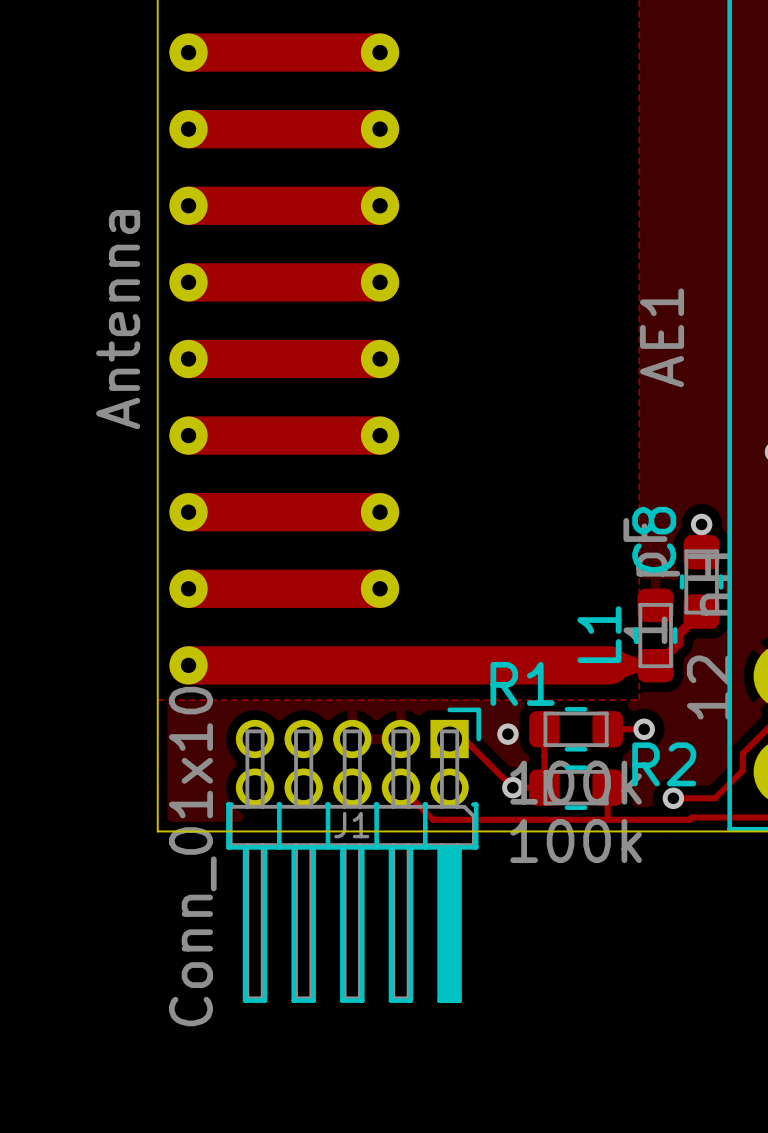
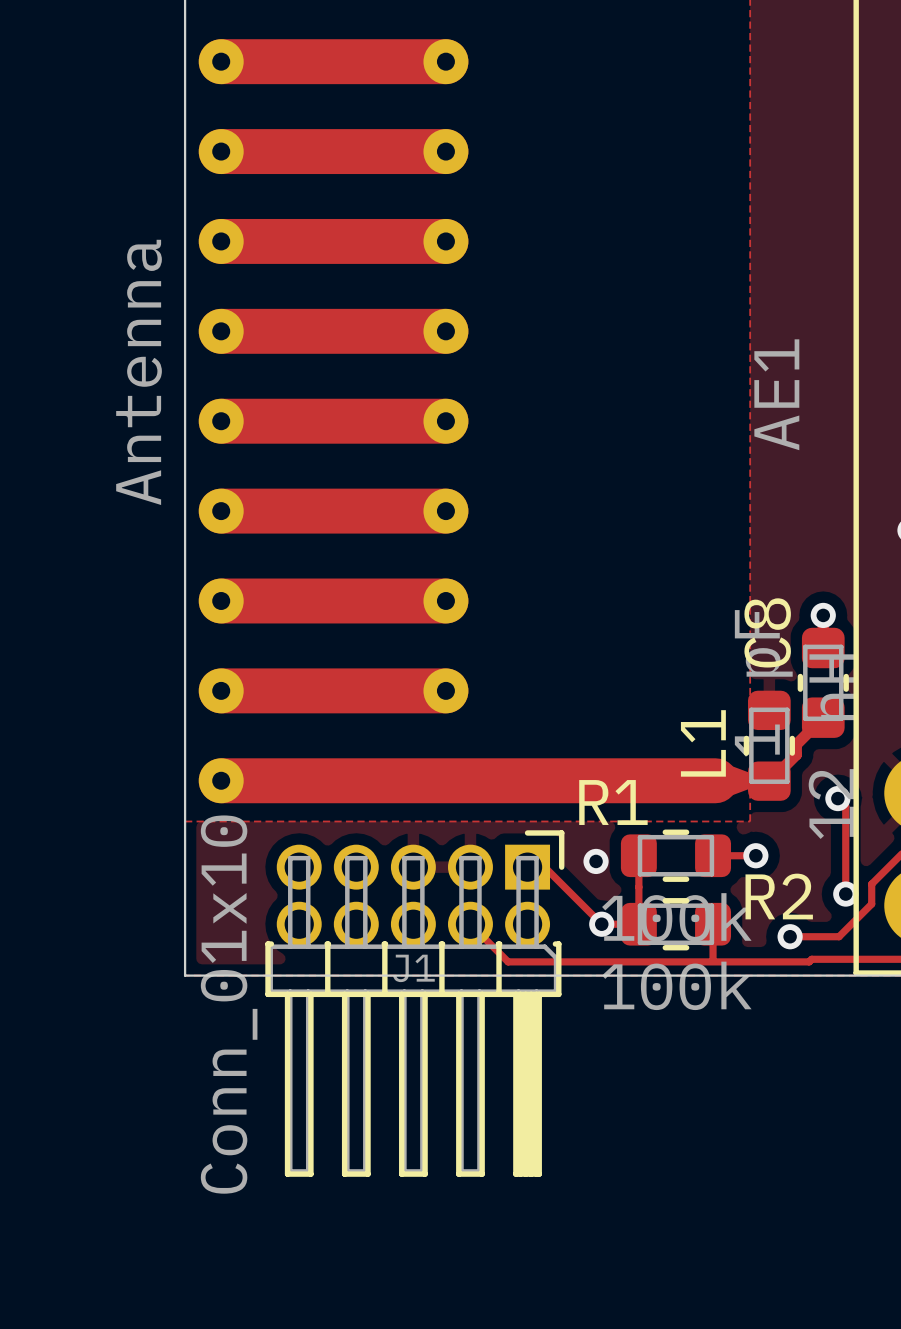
track: none -> (837, 798) (845, 806) (845, 894)
via: none -> (837, 798)
via: none -> (845, 894)

